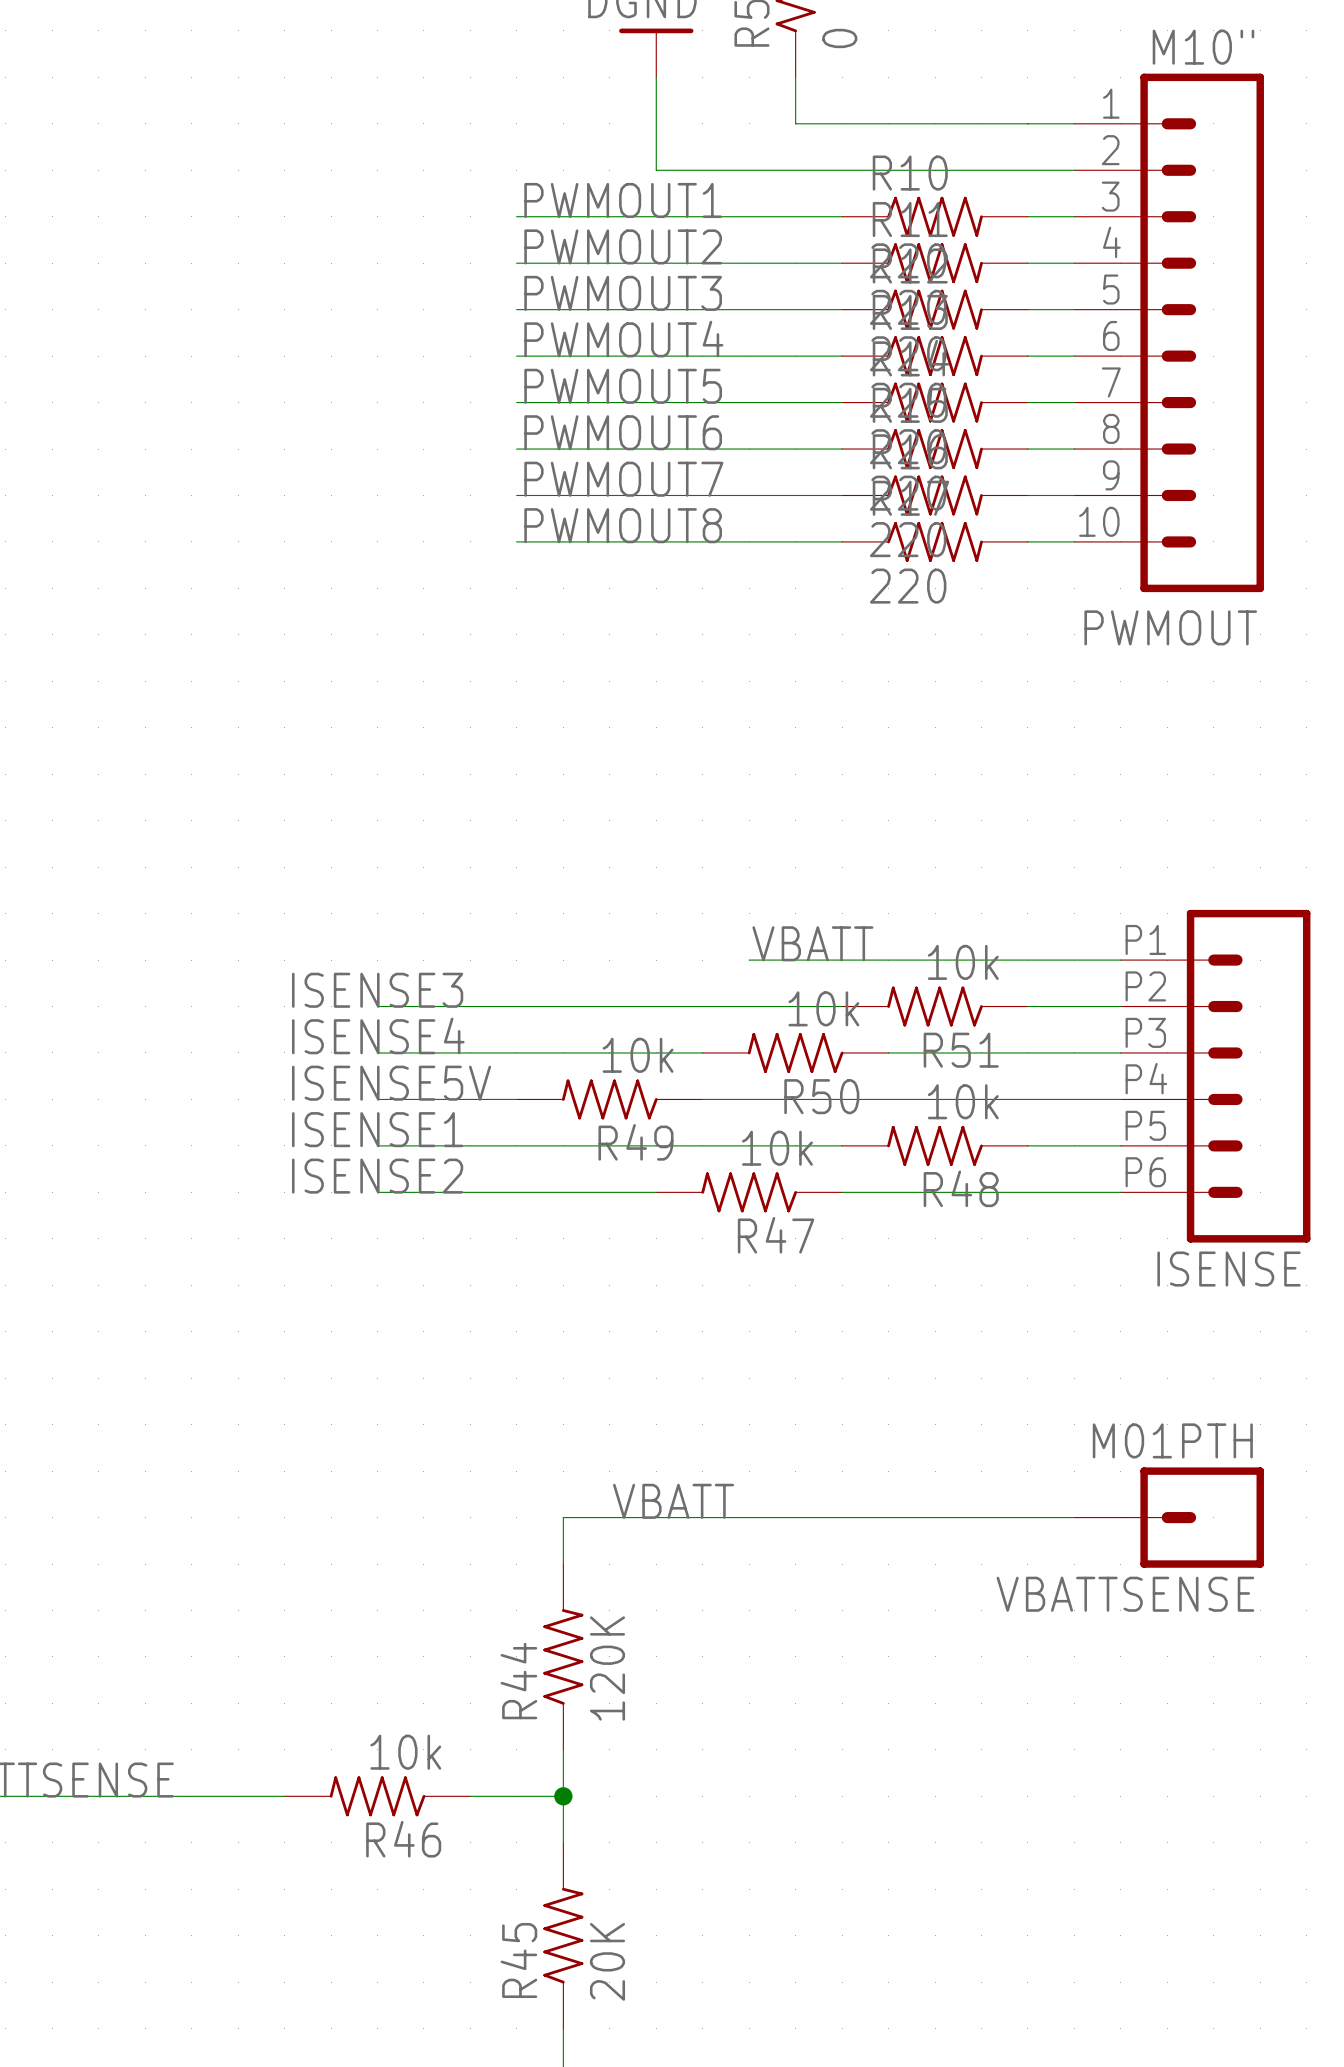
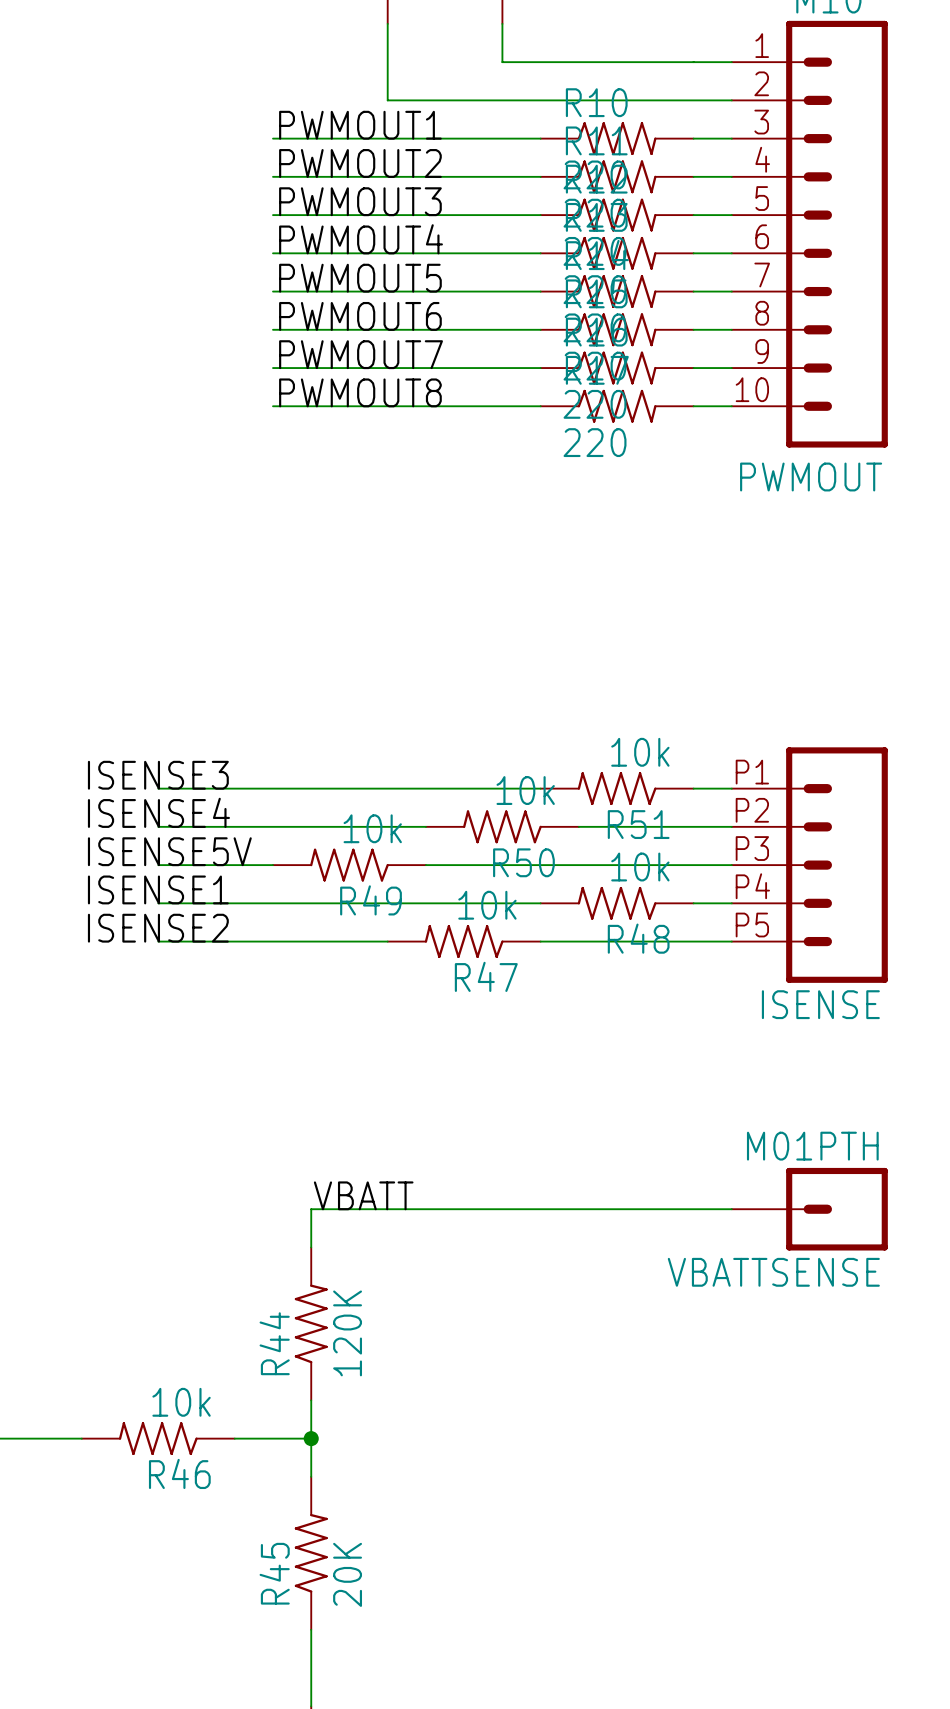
label: VBATT (812, 943) -> none
wire: (749, 960) (1120, 960) -> none
ISENSE: (1215, 1076) -> none
ISENSE: none -> (809, 865)
label position: VBATT (673, 1501) -> VBATT (363, 1195)

